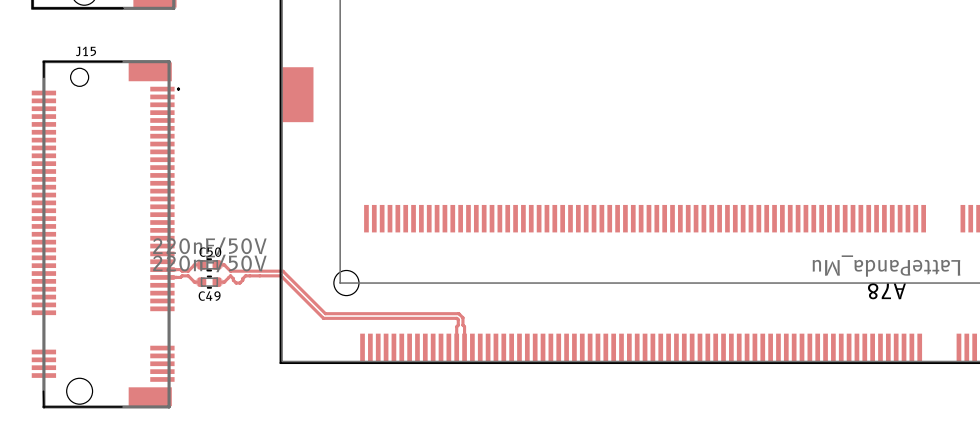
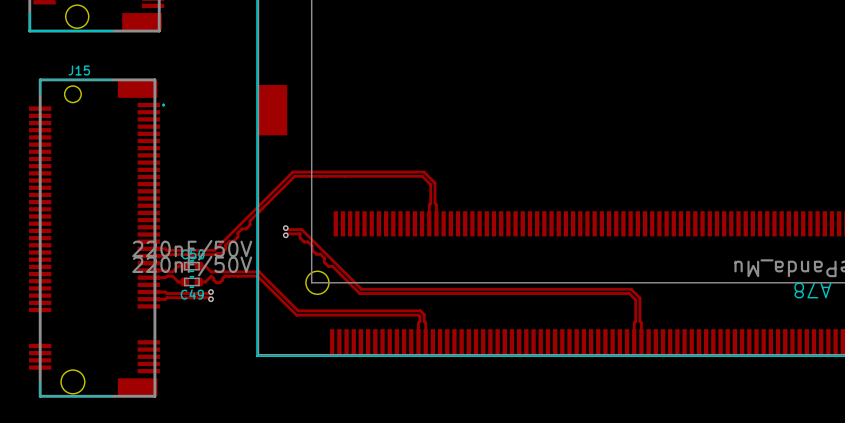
track: none -> (429, 223) (430, 184) (422, 176) (294, 176) (250, 220) (250, 224) (246, 228) (241, 228) (237, 233) (237, 237) (225, 245) (225, 249) (221, 253) (148, 256)
track: none -> (436, 223) (435, 183) (424, 172) (292, 172) (214, 250) (148, 248)
track: none -> (285, 228) (301, 229) (361, 289) (631, 289) (639, 298) (641, 341)
via: none -> (285, 228)
track: none -> (285, 235) (300, 233) (300, 237) (304, 241) (308, 241) (316, 254) (320, 254) (324, 258) (324, 262) (328, 266) (332, 266) (359, 293) (629, 293) (635, 299) (634, 341)
via: none -> (285, 235)
track: none -> (148, 292) (211, 292)
via: none -> (211, 292)
track: none -> (148, 299) (211, 299)
via: none -> (211, 299)

